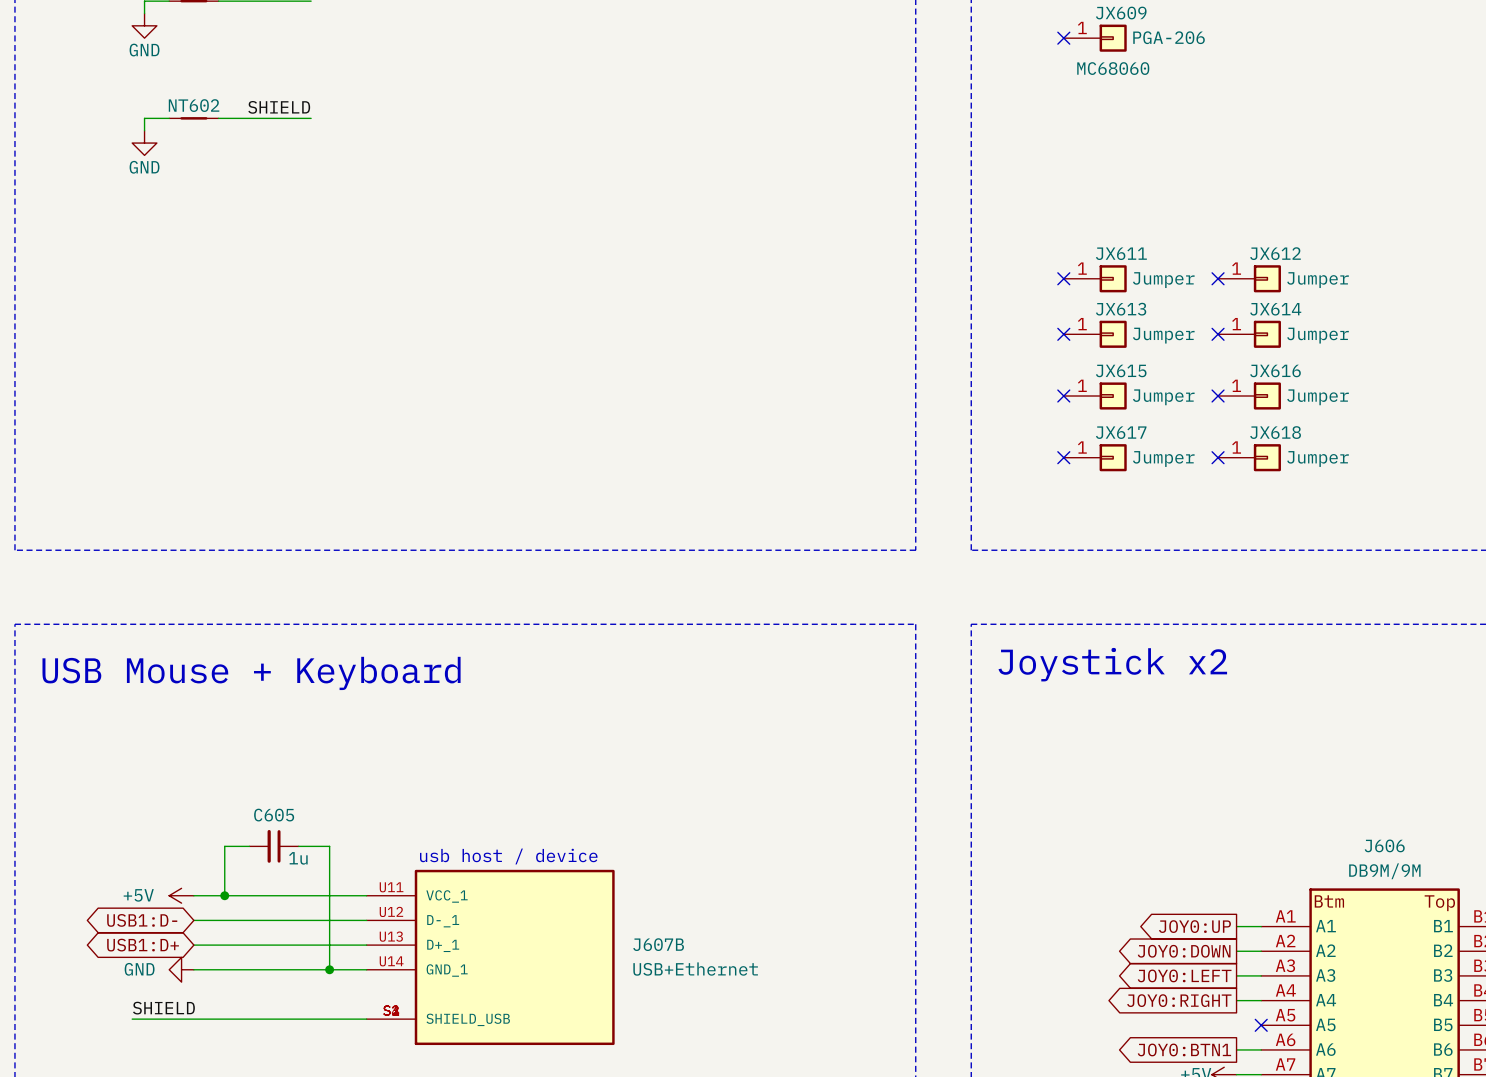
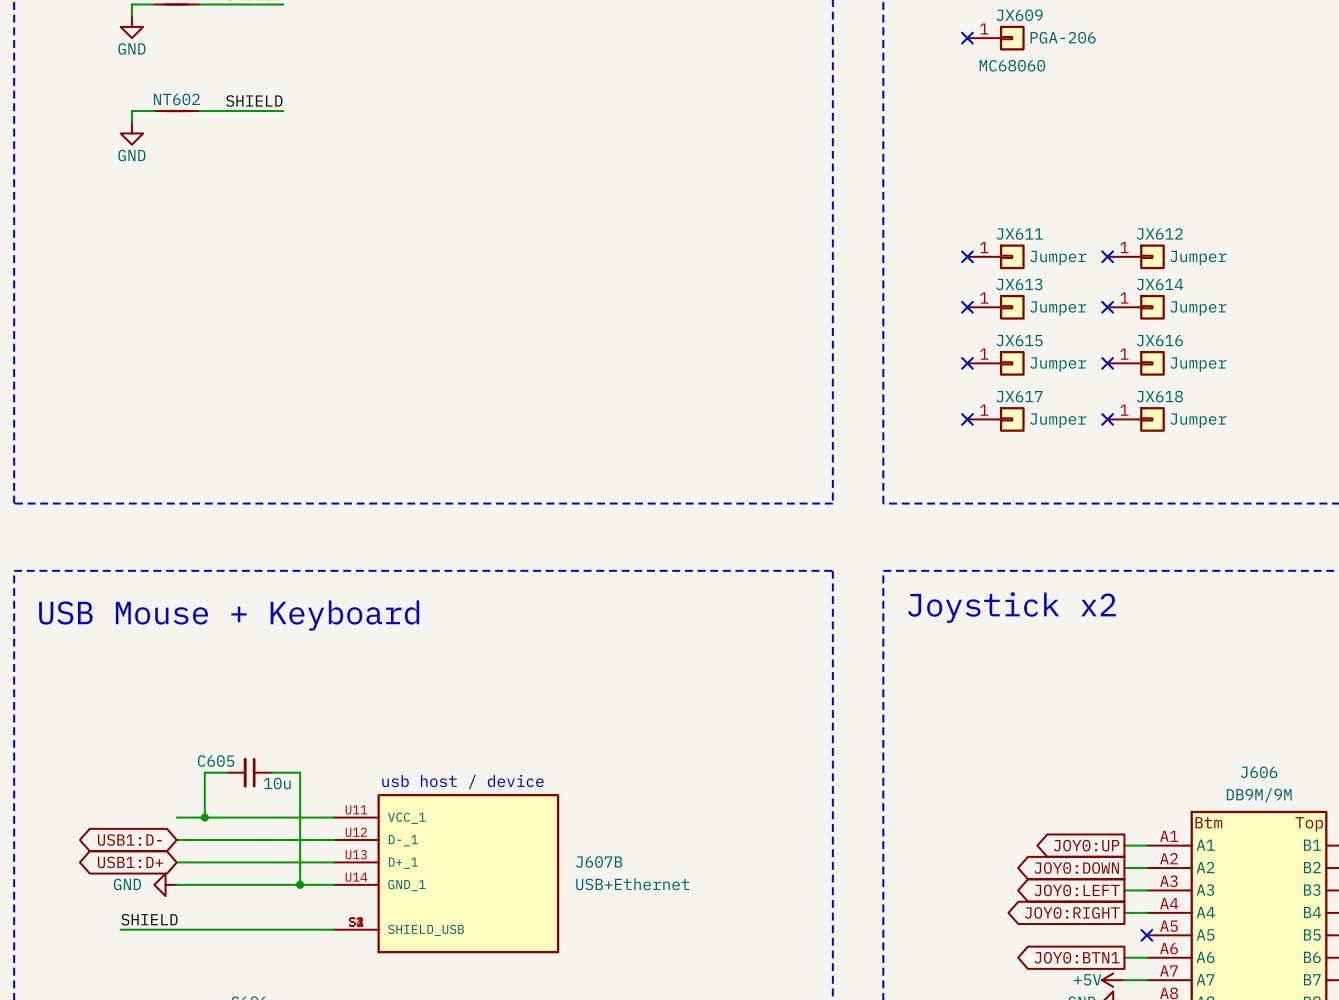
C605 name position: C605 (274, 815) -> C605 (216, 761)
C605 value: 1u (298, 858) -> 10u (277, 783)
power symbol: +5V (181, 895) -> none

